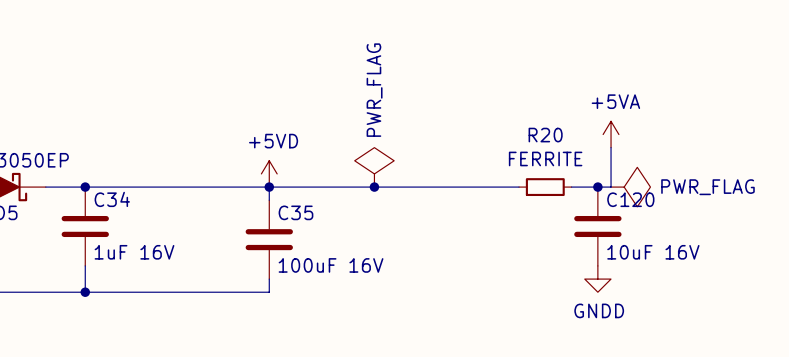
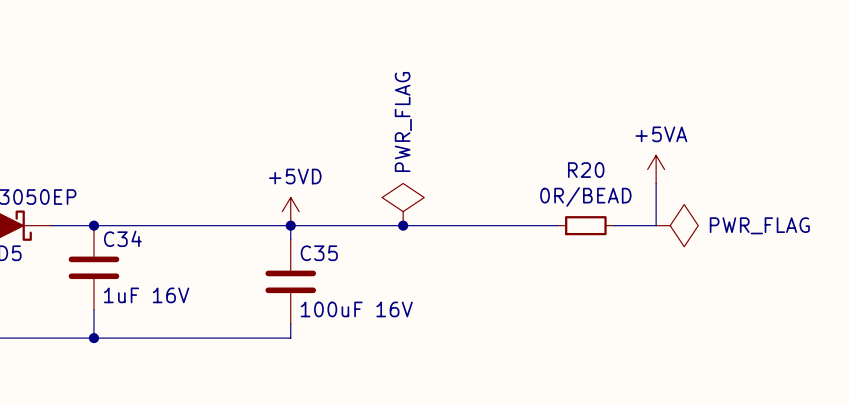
R20 value: FERRITE (545, 158) -> 0R/BEAD (585, 196)
junction: (597, 187) -> none
C120: 10uF 16V (597, 226) -> none
power symbol: GNDD (597, 279) -> none

